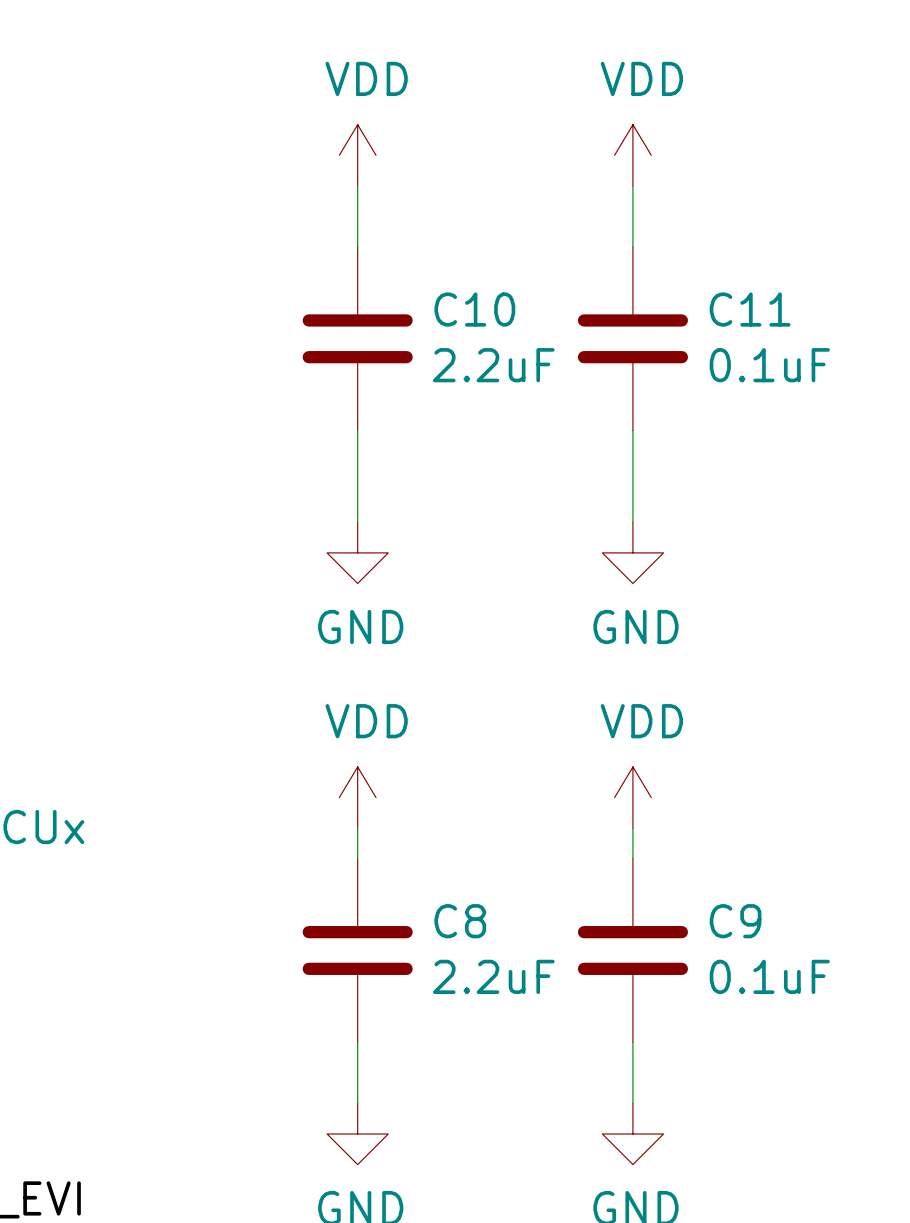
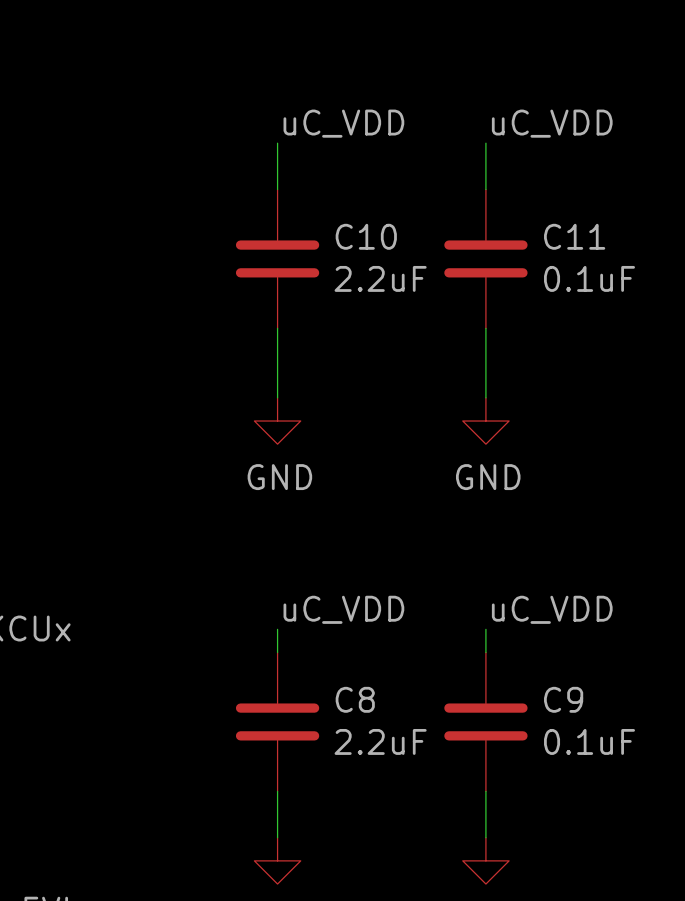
power symbol: VDD (357, 155) -> none
power symbol: VDD (632, 155) -> none
label: none -> uC_VDD (343, 123)
label: none -> uC_VDD (552, 123)
power symbol: VDD (357, 797) -> none
power symbol: VDD (632, 797) -> none
label: none -> uC_VDD (343, 609)
label: none -> uC_VDD (552, 609)

